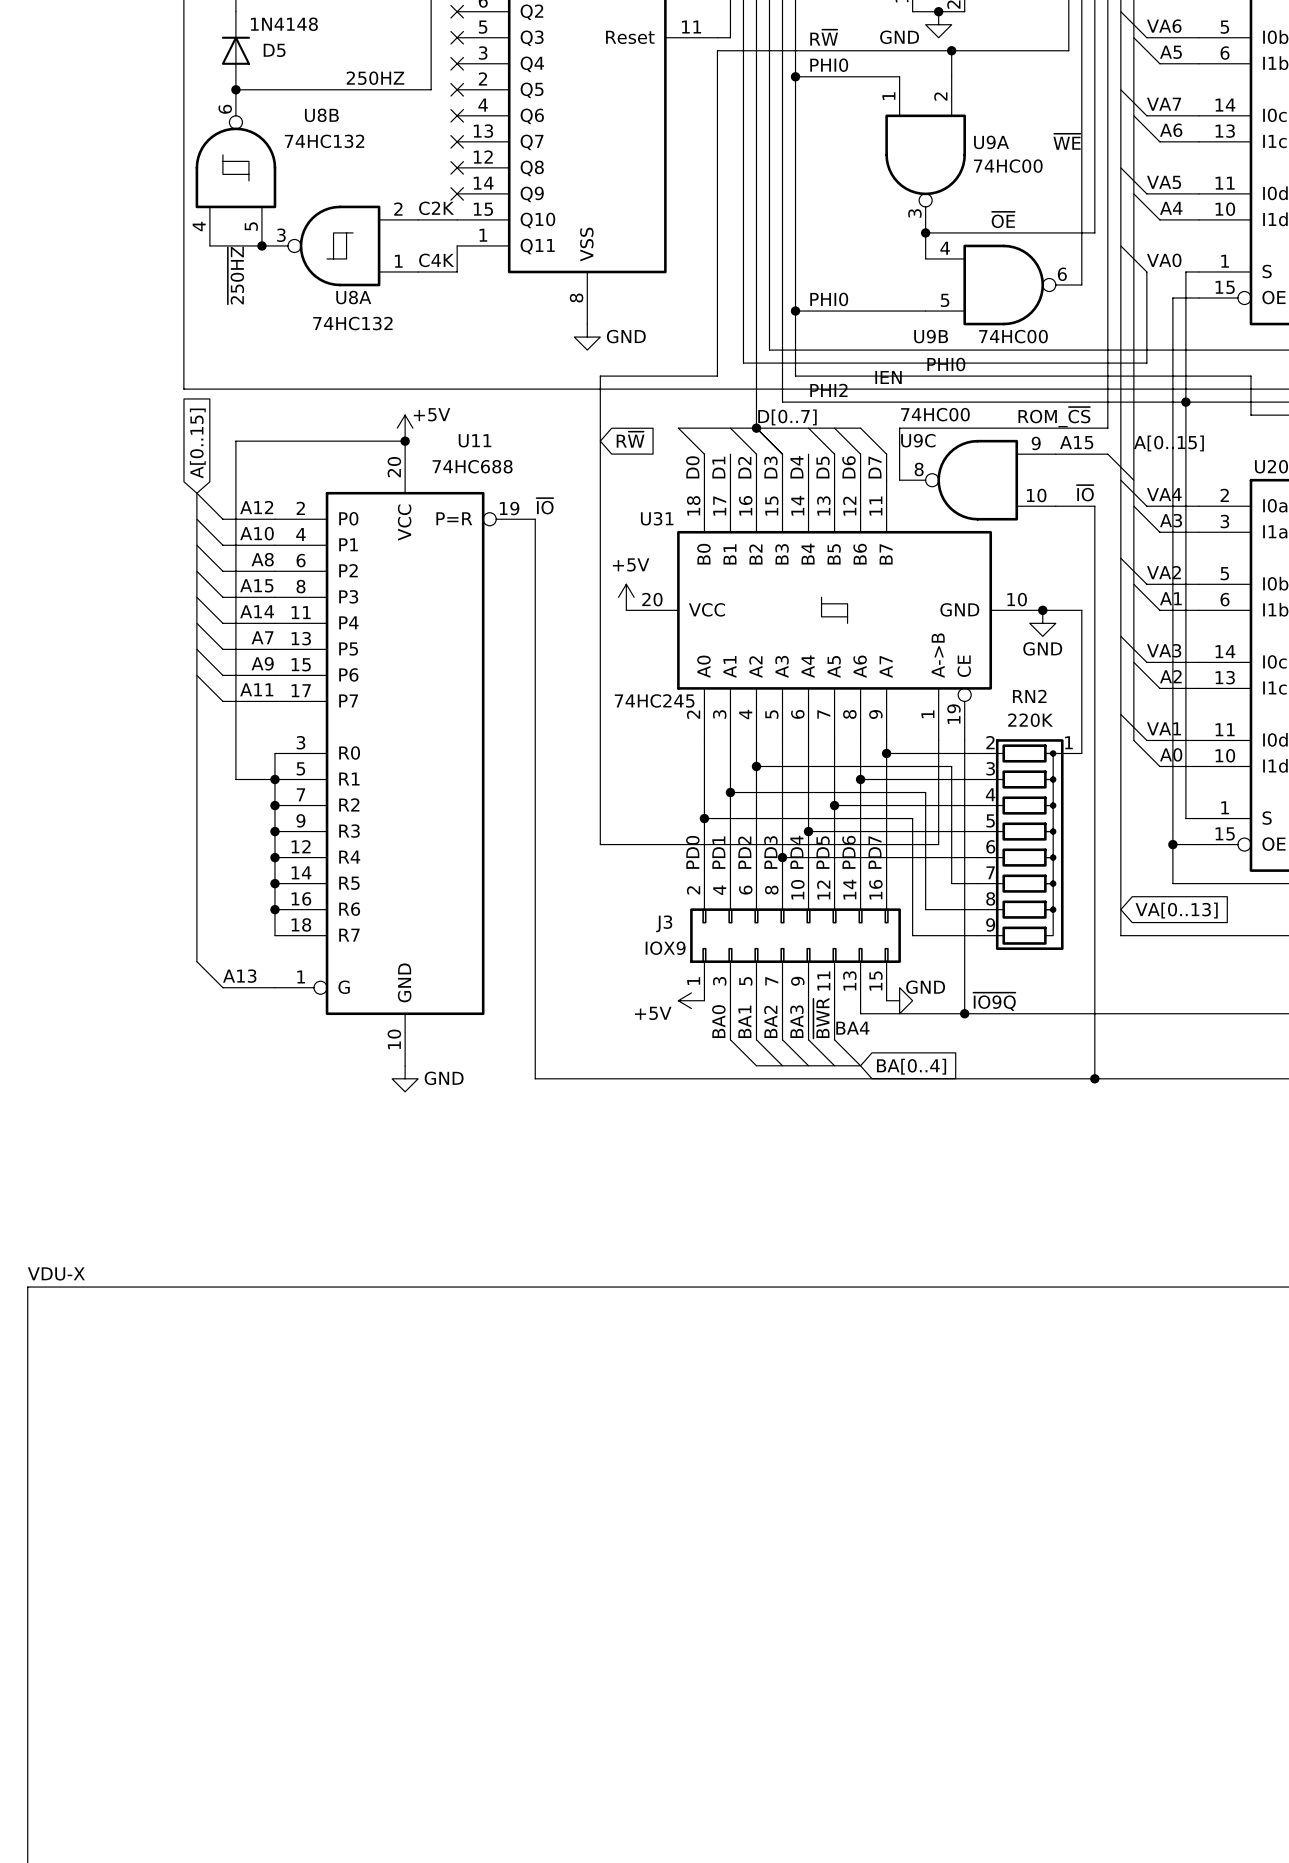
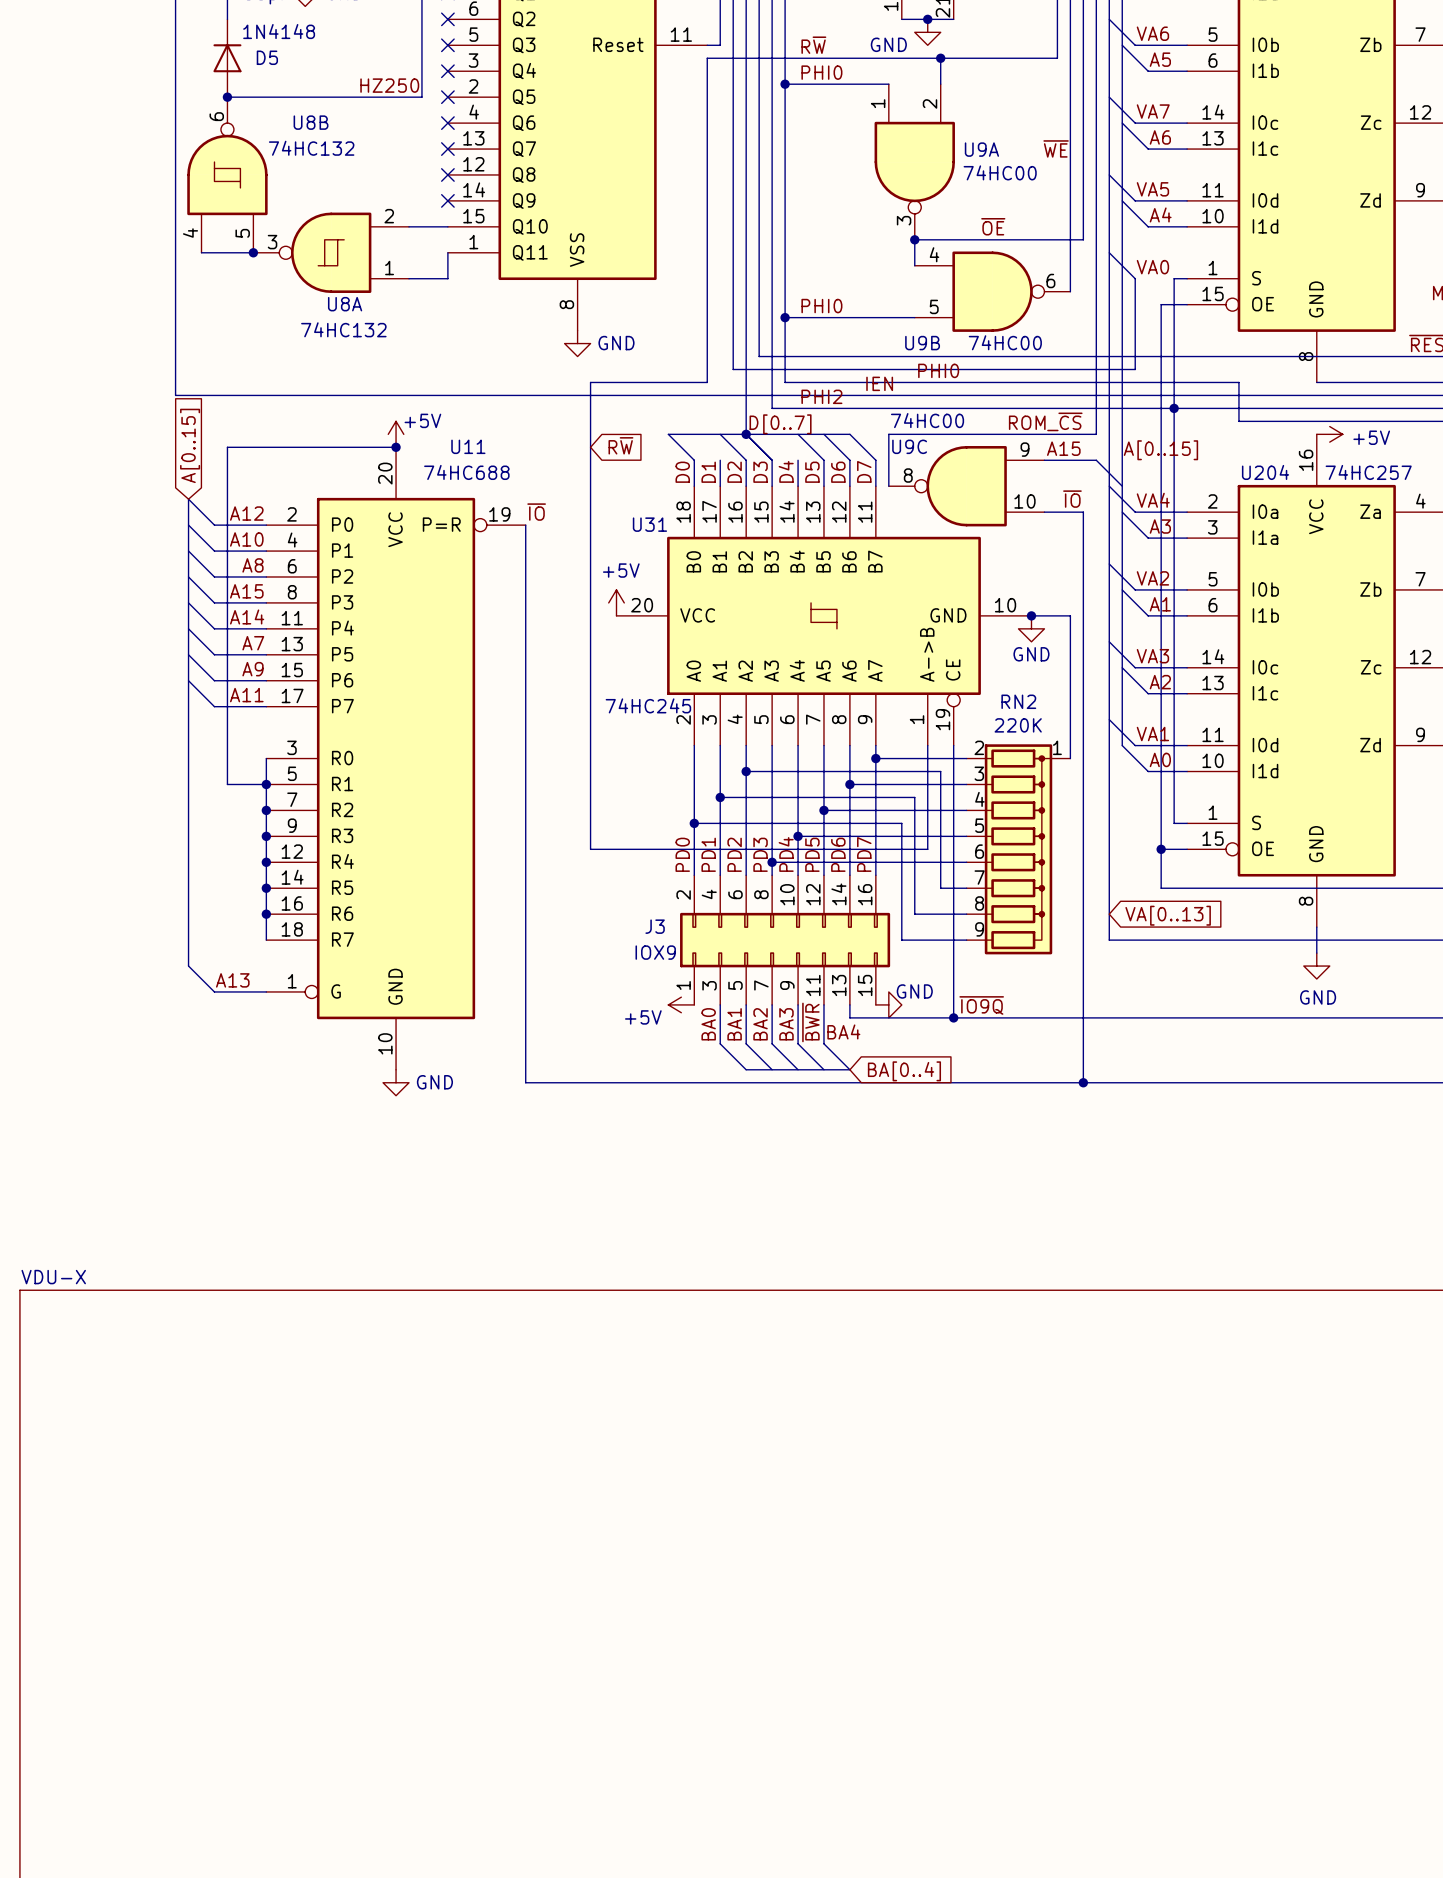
label: 250HZ (375, 78) -> none
label: none -> HZ250 (389, 85)
label: C2K (436, 208) -> none
label: C4K (436, 260) -> none
label: ~{250HZ} (235, 275) -> none

